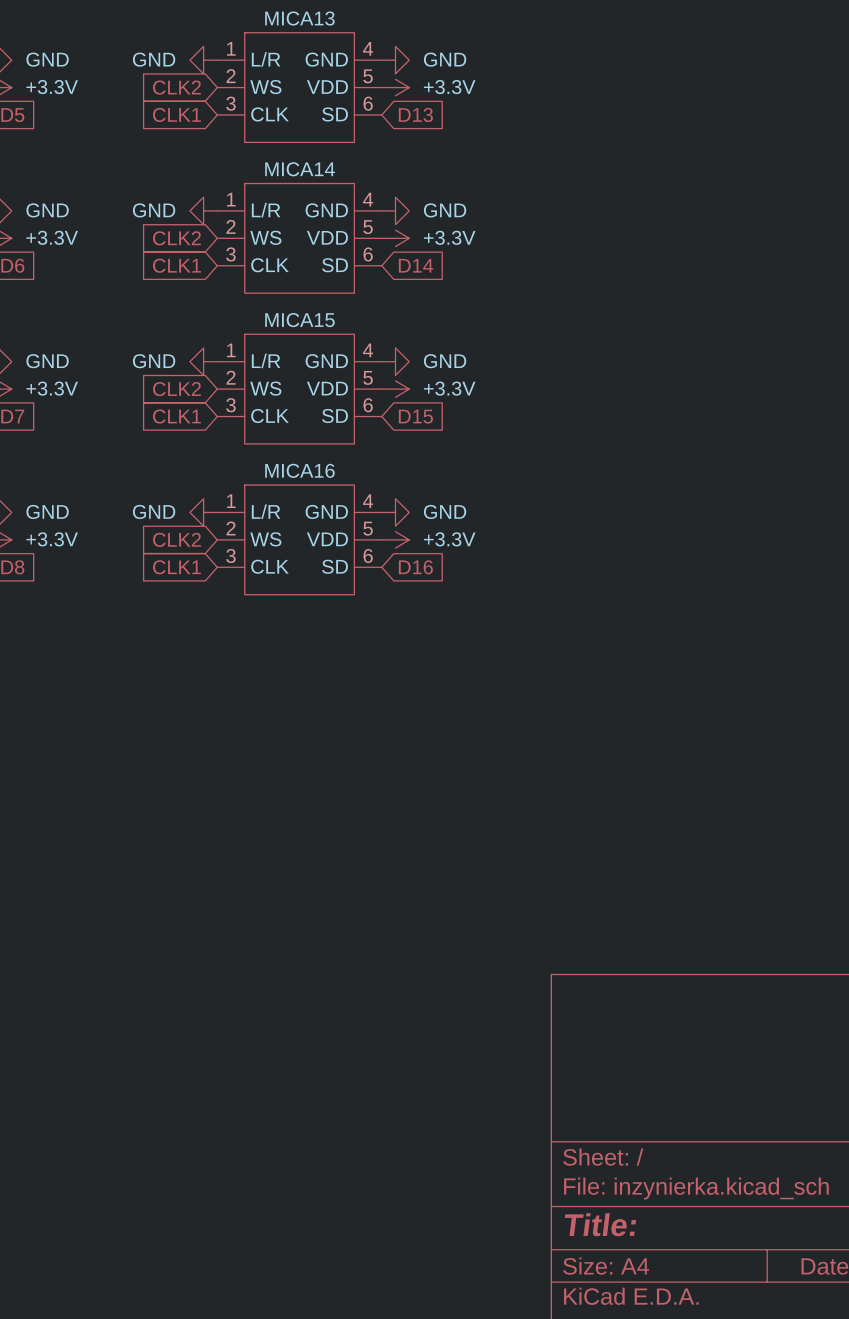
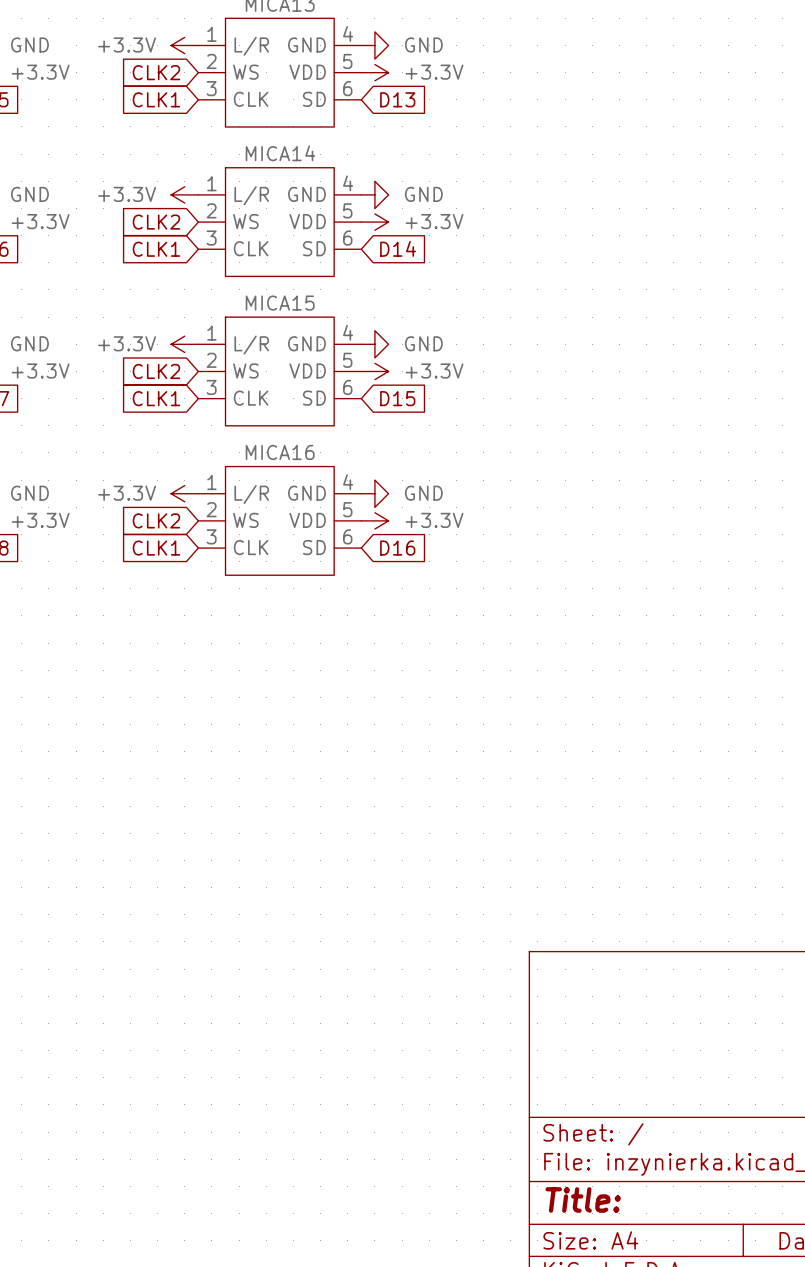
power symbol: GND (203, 60) -> +3.3V (184, 45)
power symbol: GND (203, 210) -> +3.3V (184, 194)
power symbol: GND (203, 361) -> +3.3V (184, 344)
power symbol: GND (203, 512) -> +3.3V (184, 493)

